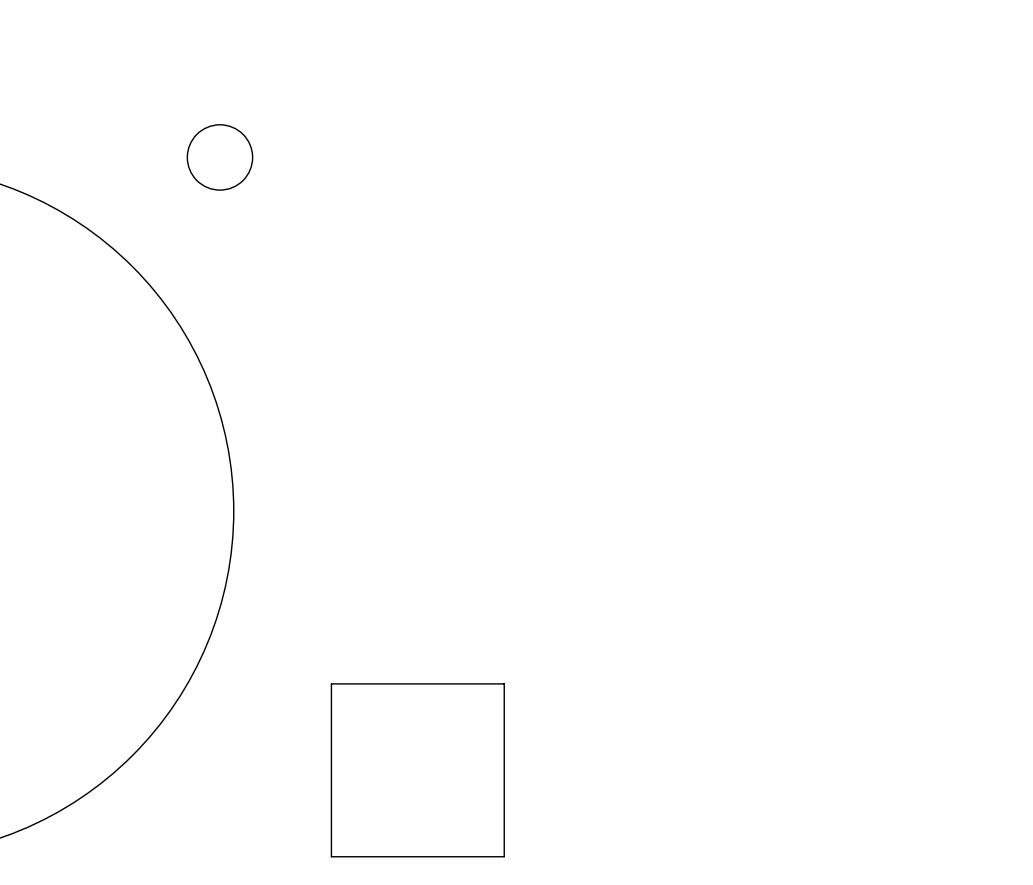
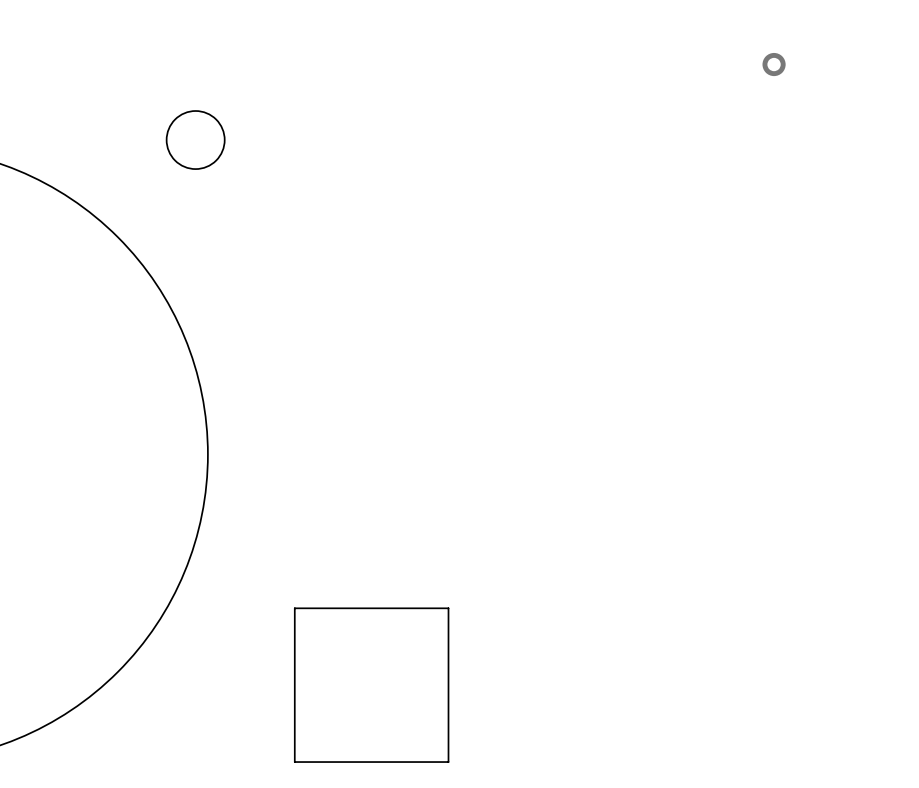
via: none -> (774, 64)

